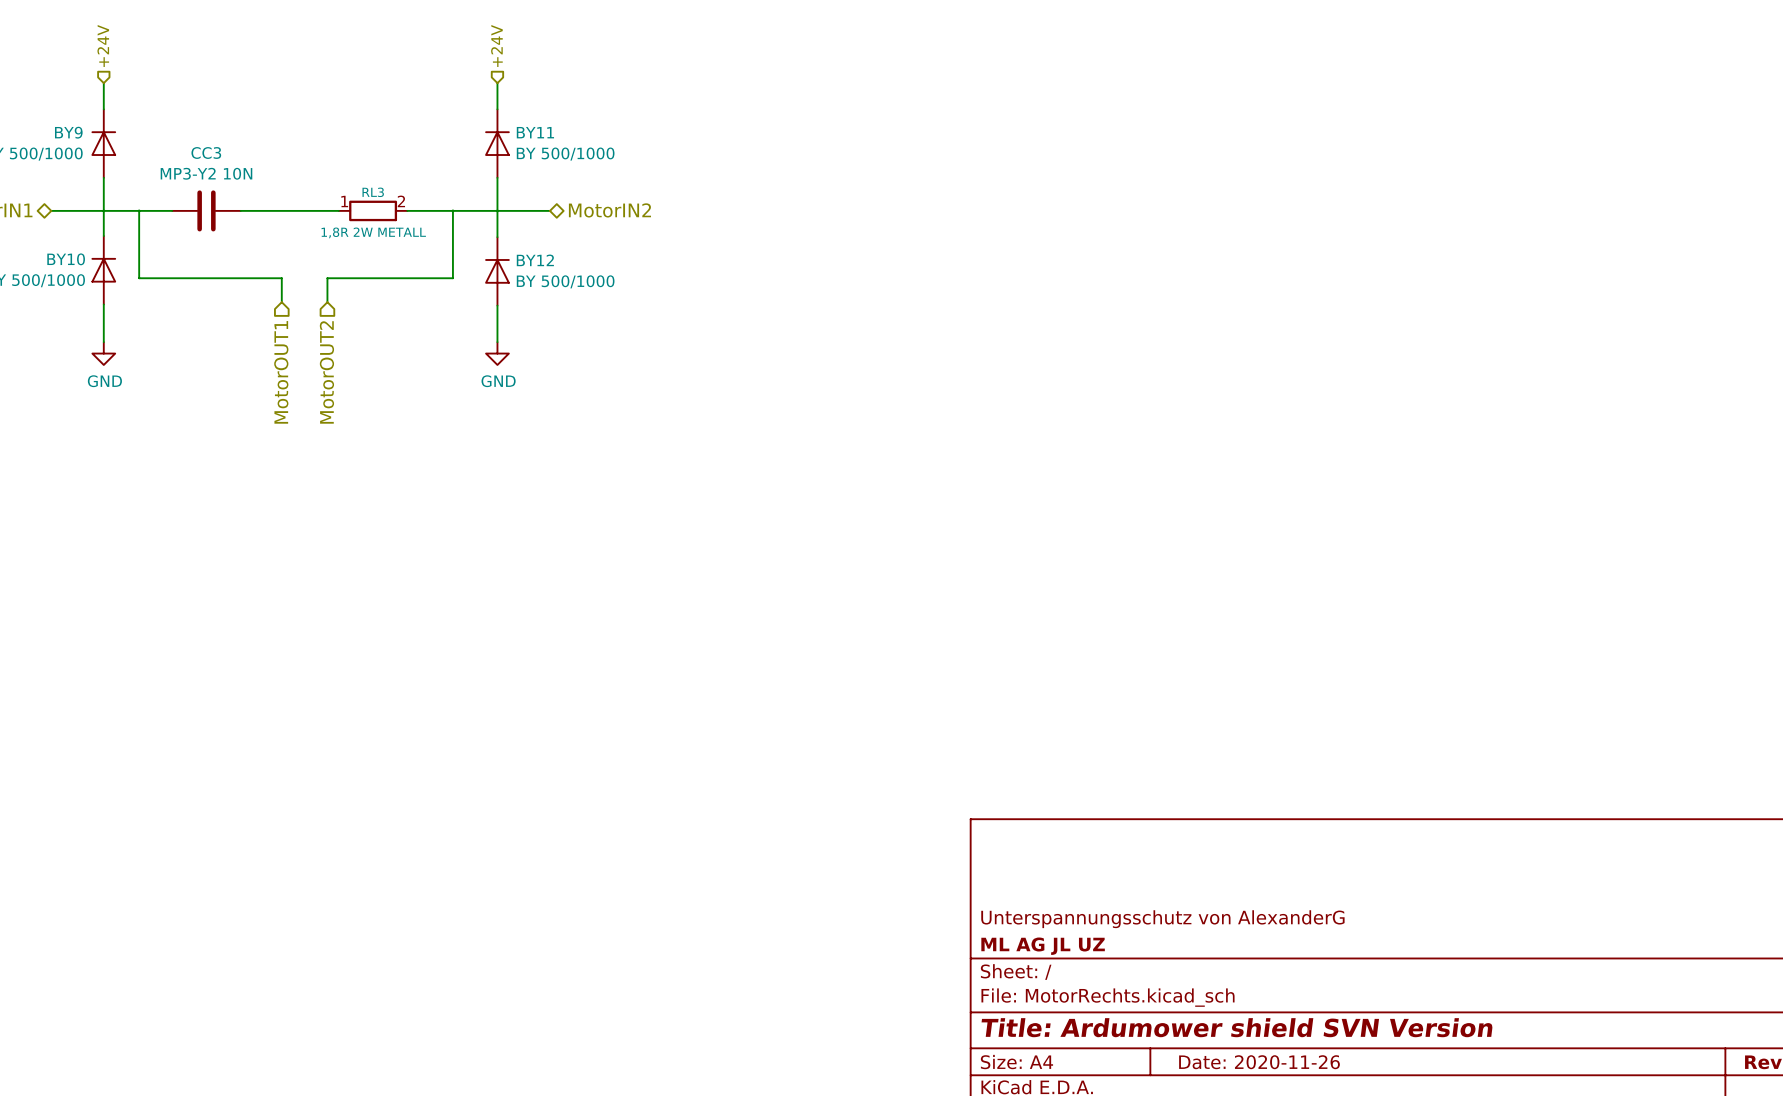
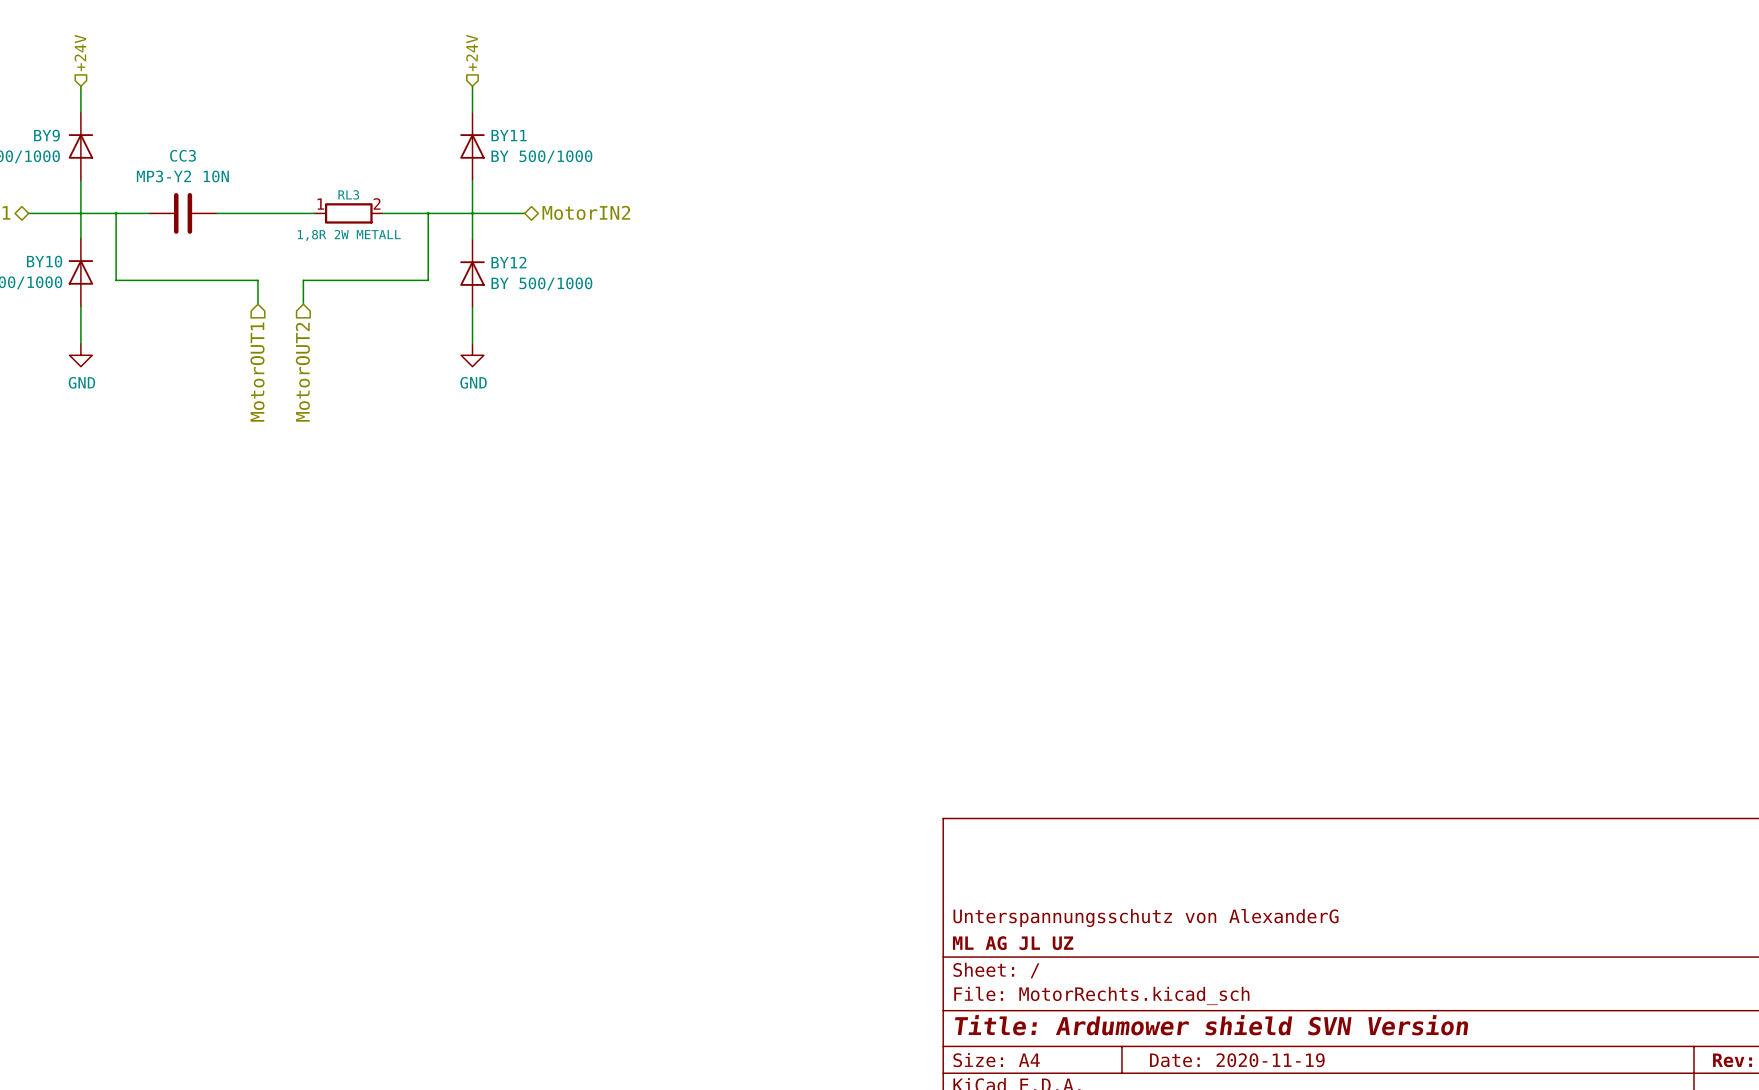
title block: Date: 2020-11-26 (1259, 1062) -> Date: 2020-11-19 (1237, 1060)

